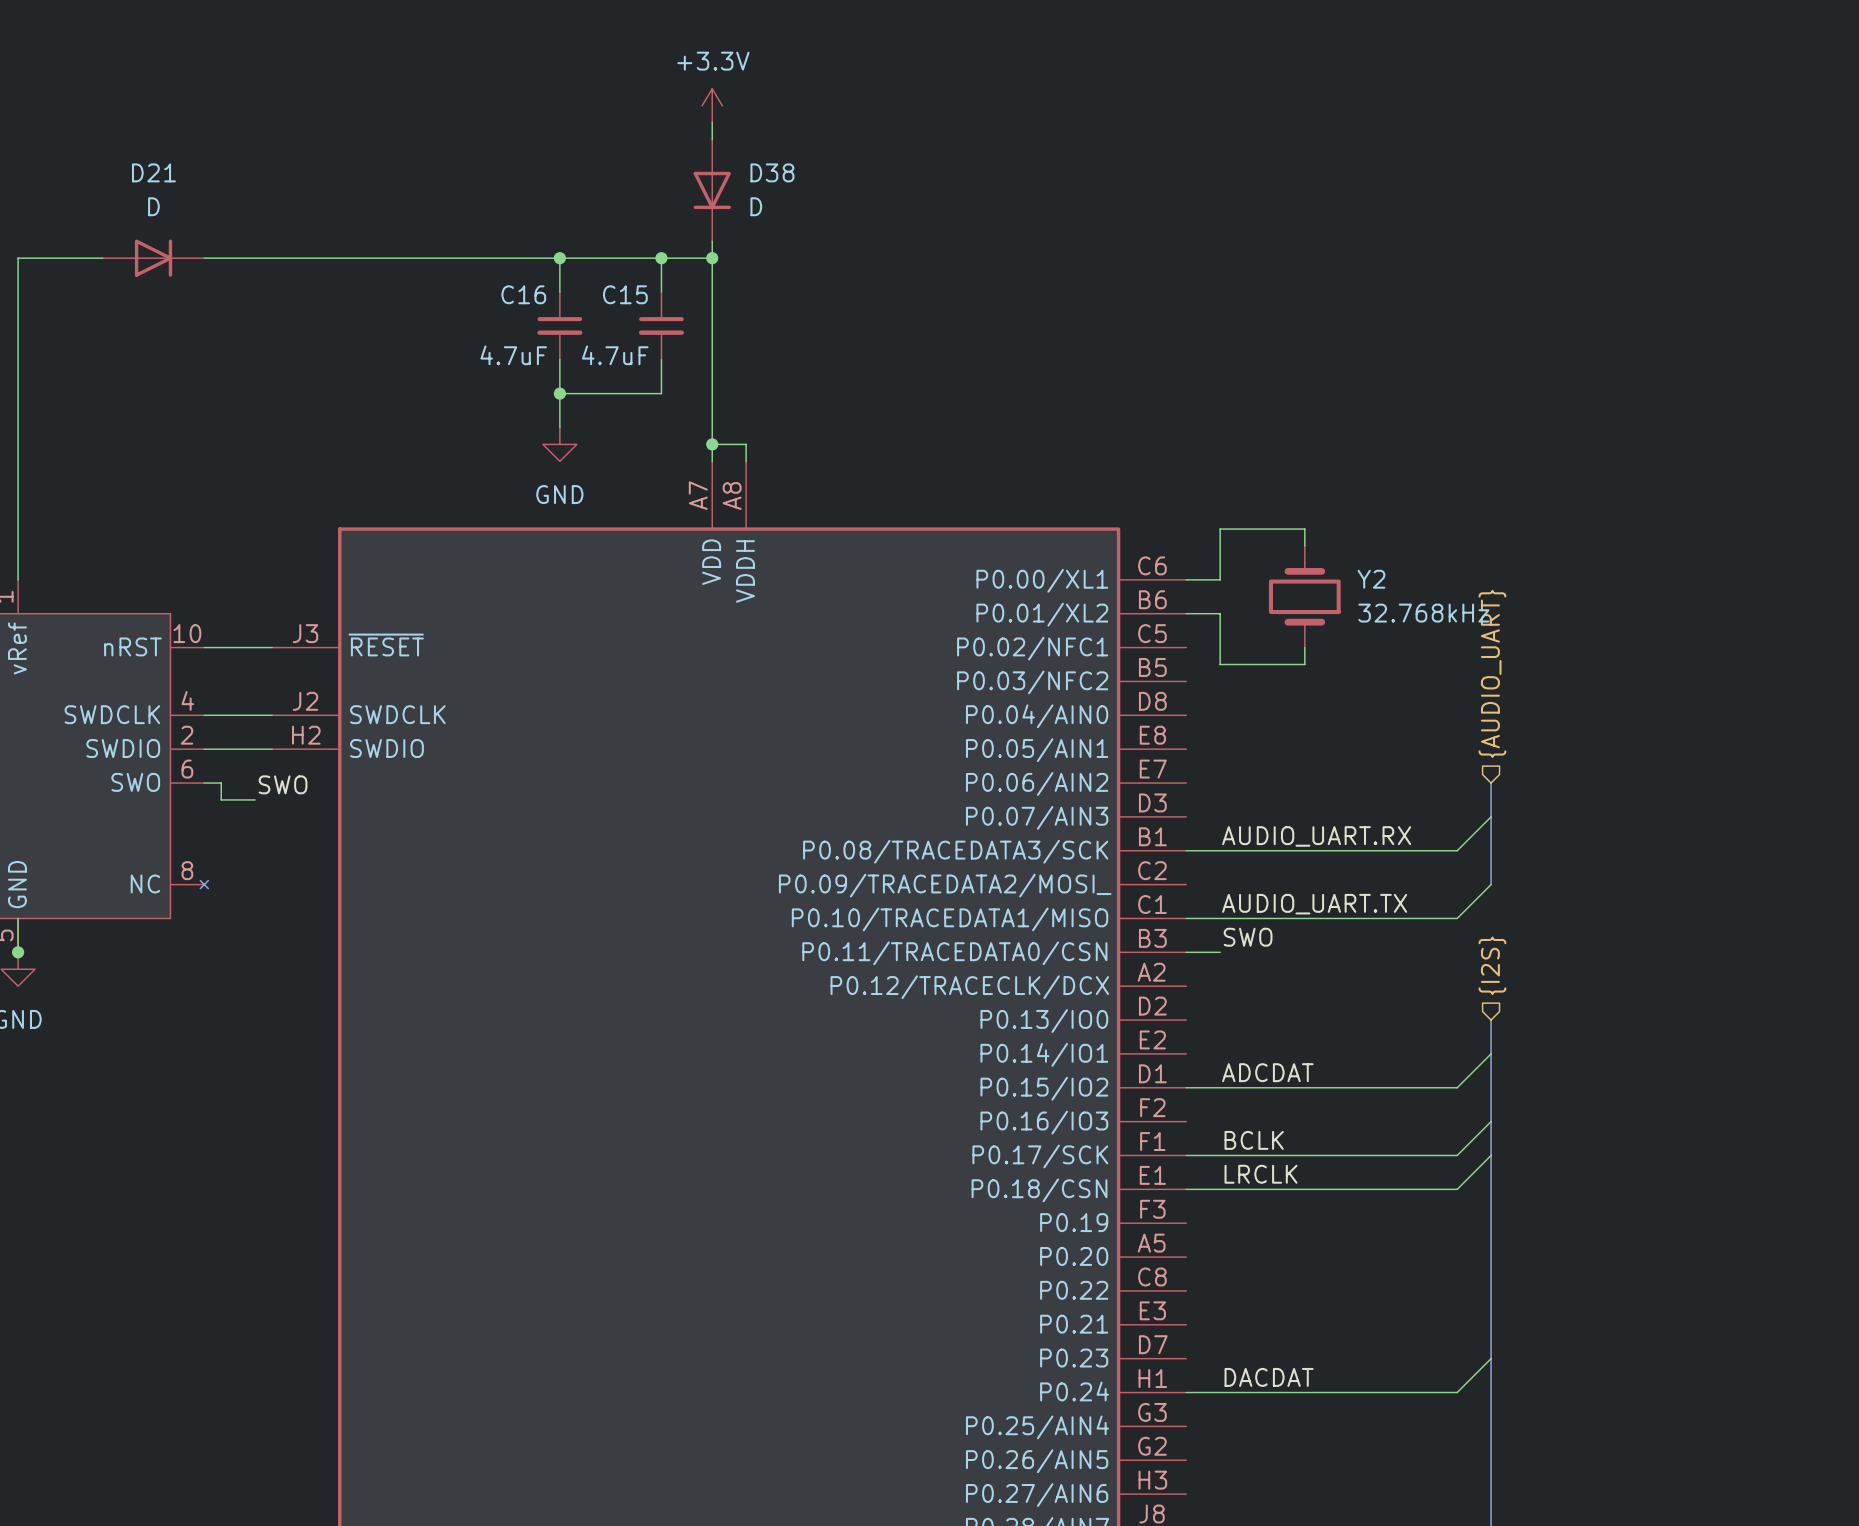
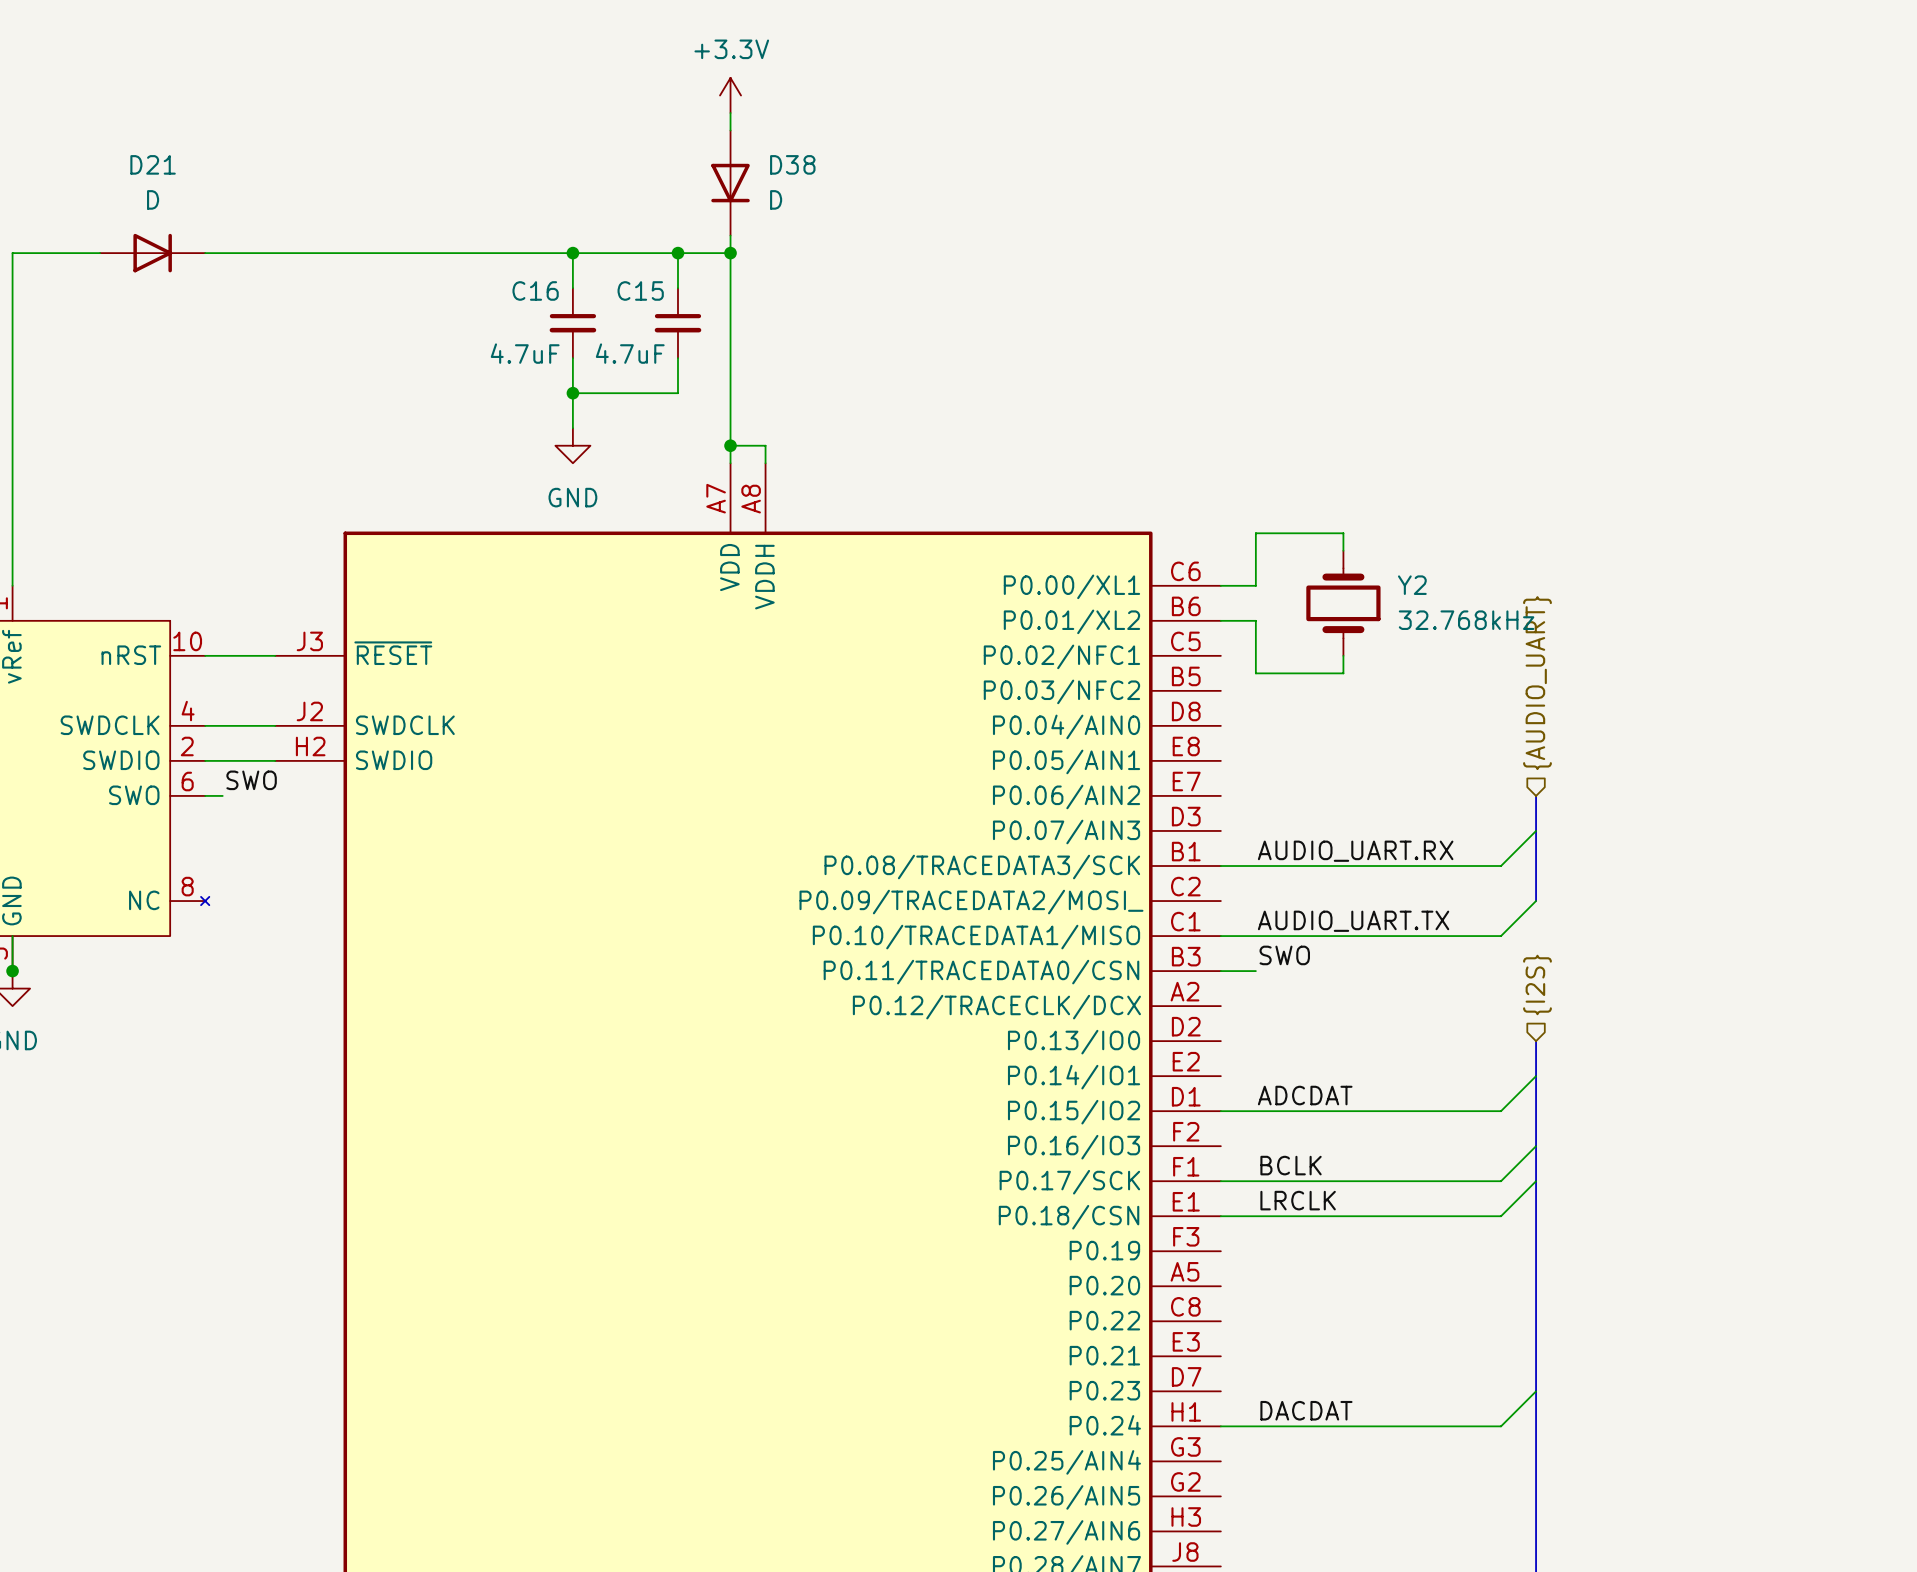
wire: (221, 783) (221, 799) (255, 799) -> none
label position: SWO (283, 784) -> SWO (251, 780)

